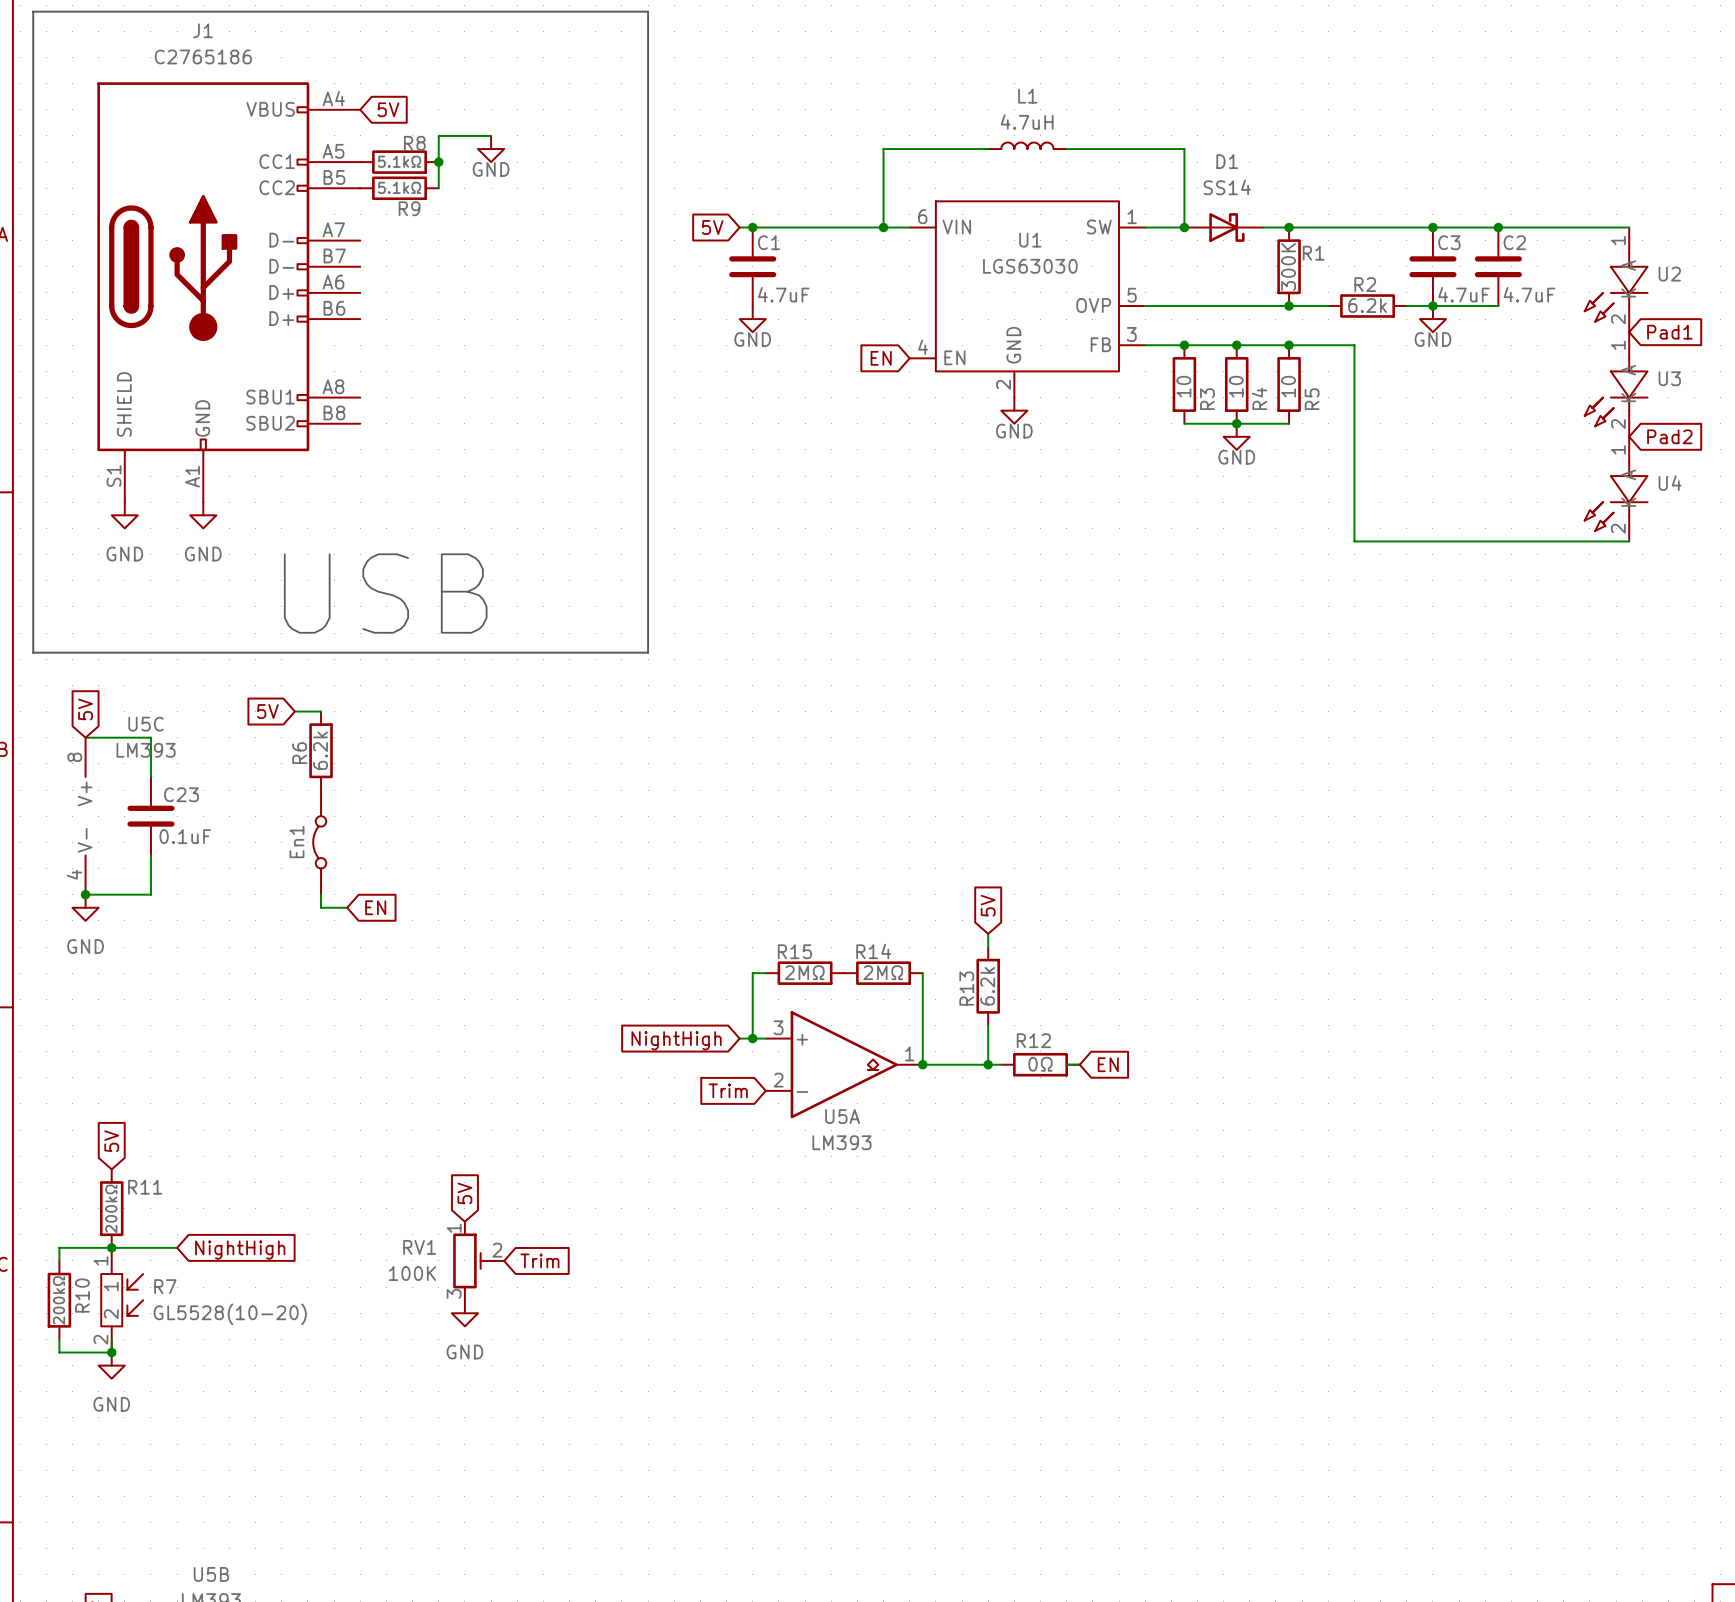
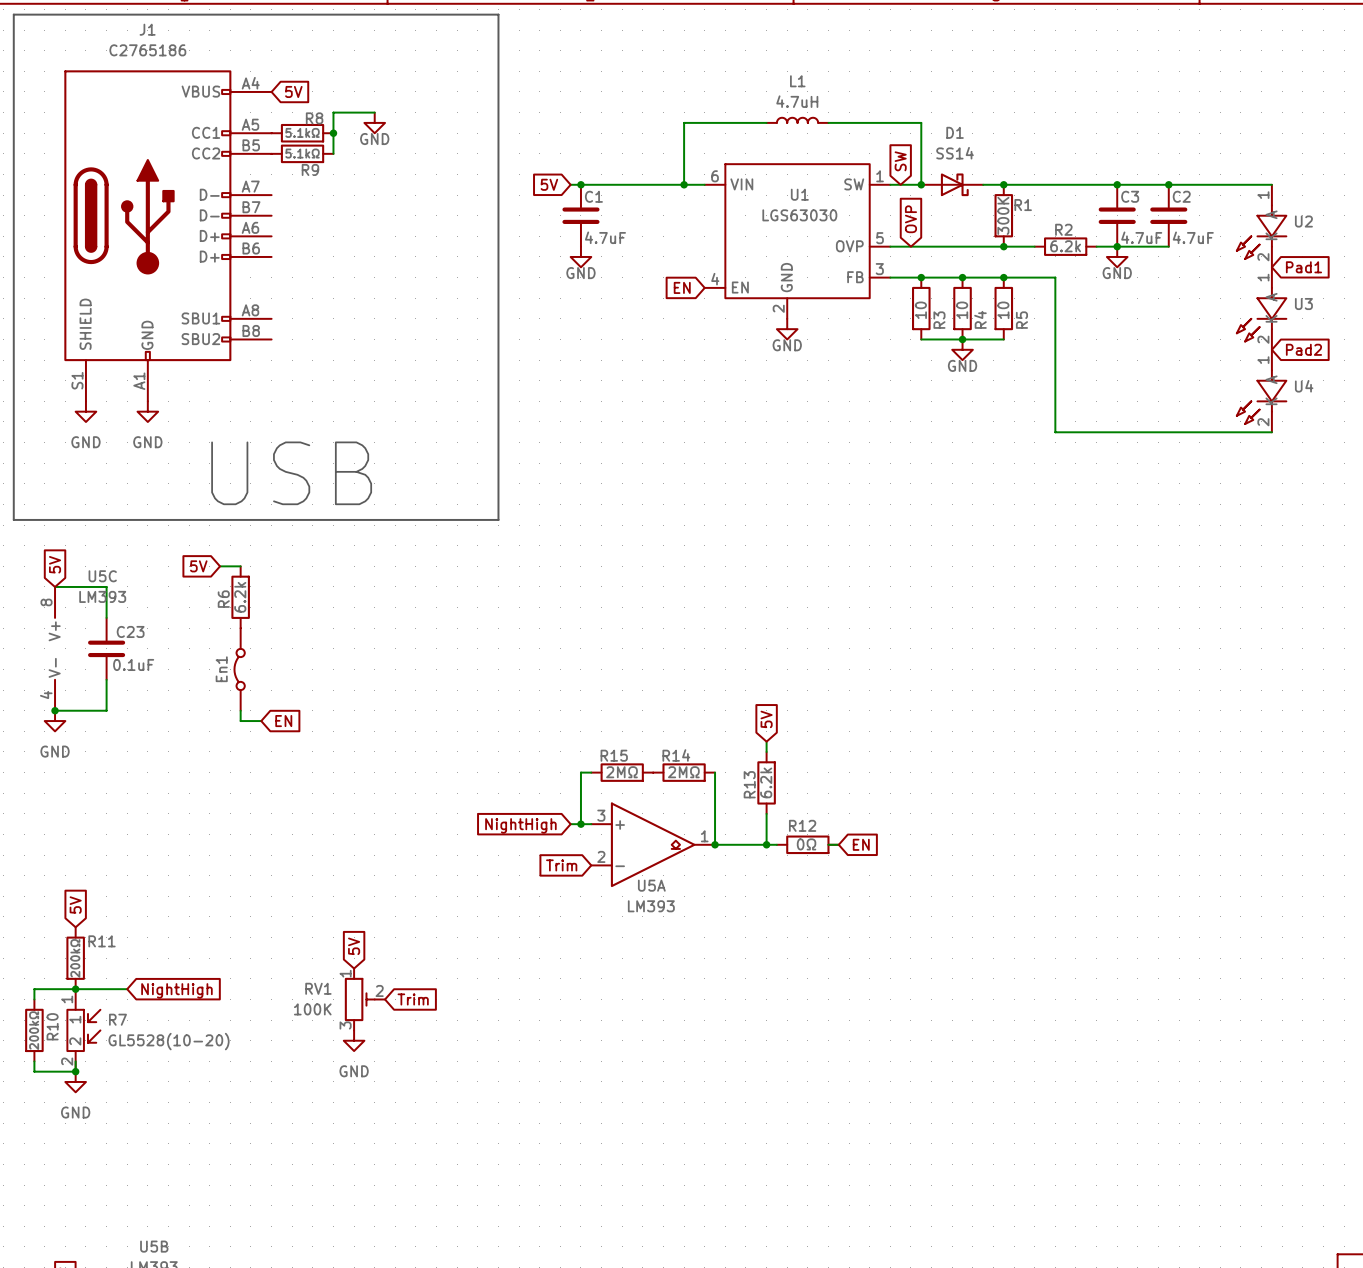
global label: none -> SW (900, 161)
global label: none -> OVP (910, 219)
R12 value: none -> 0Ω (806, 844)
R12 text: 0Ω (1040, 1064) -> none

